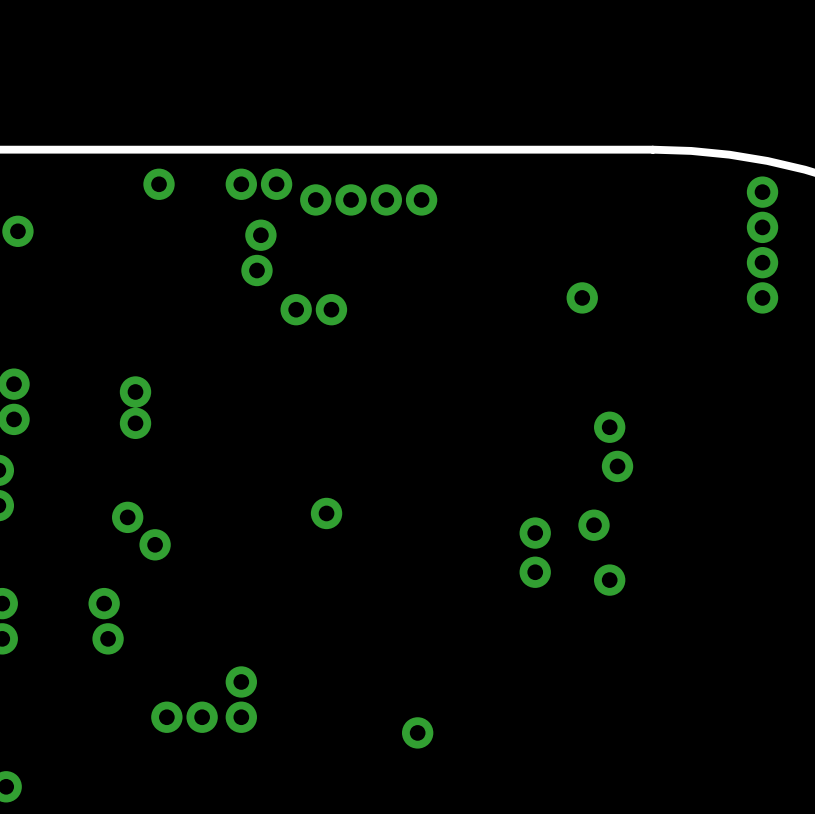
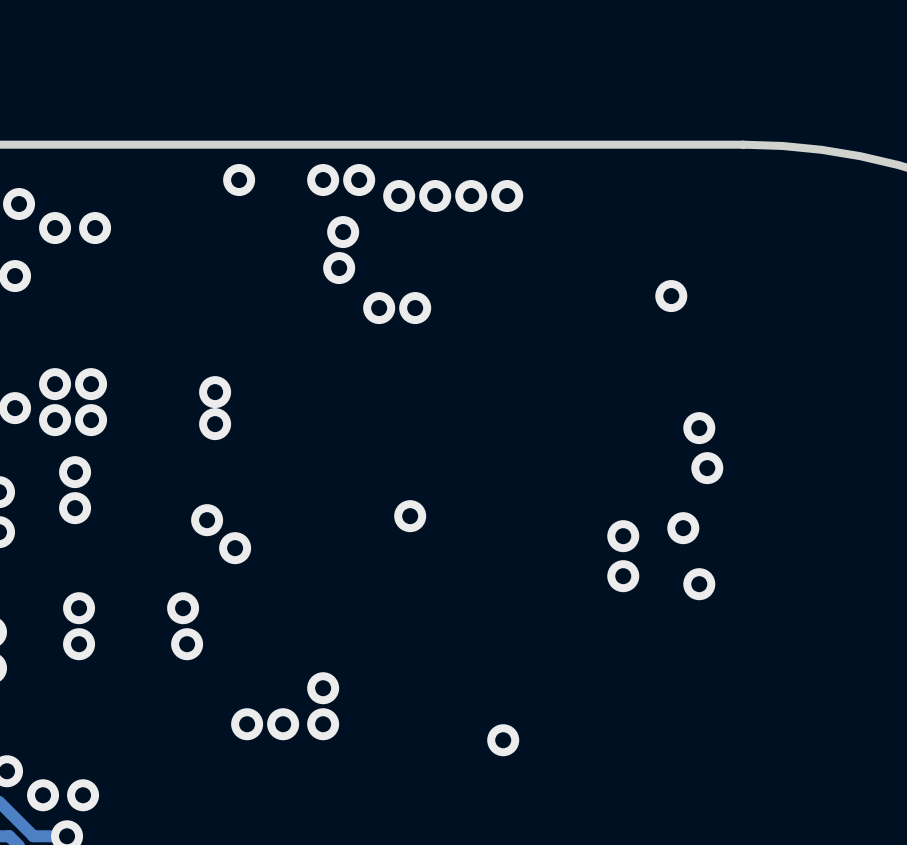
via: (762, 192) -> none
via: (762, 227) -> none
via: (762, 262) -> none
via: (762, 297) -> none

